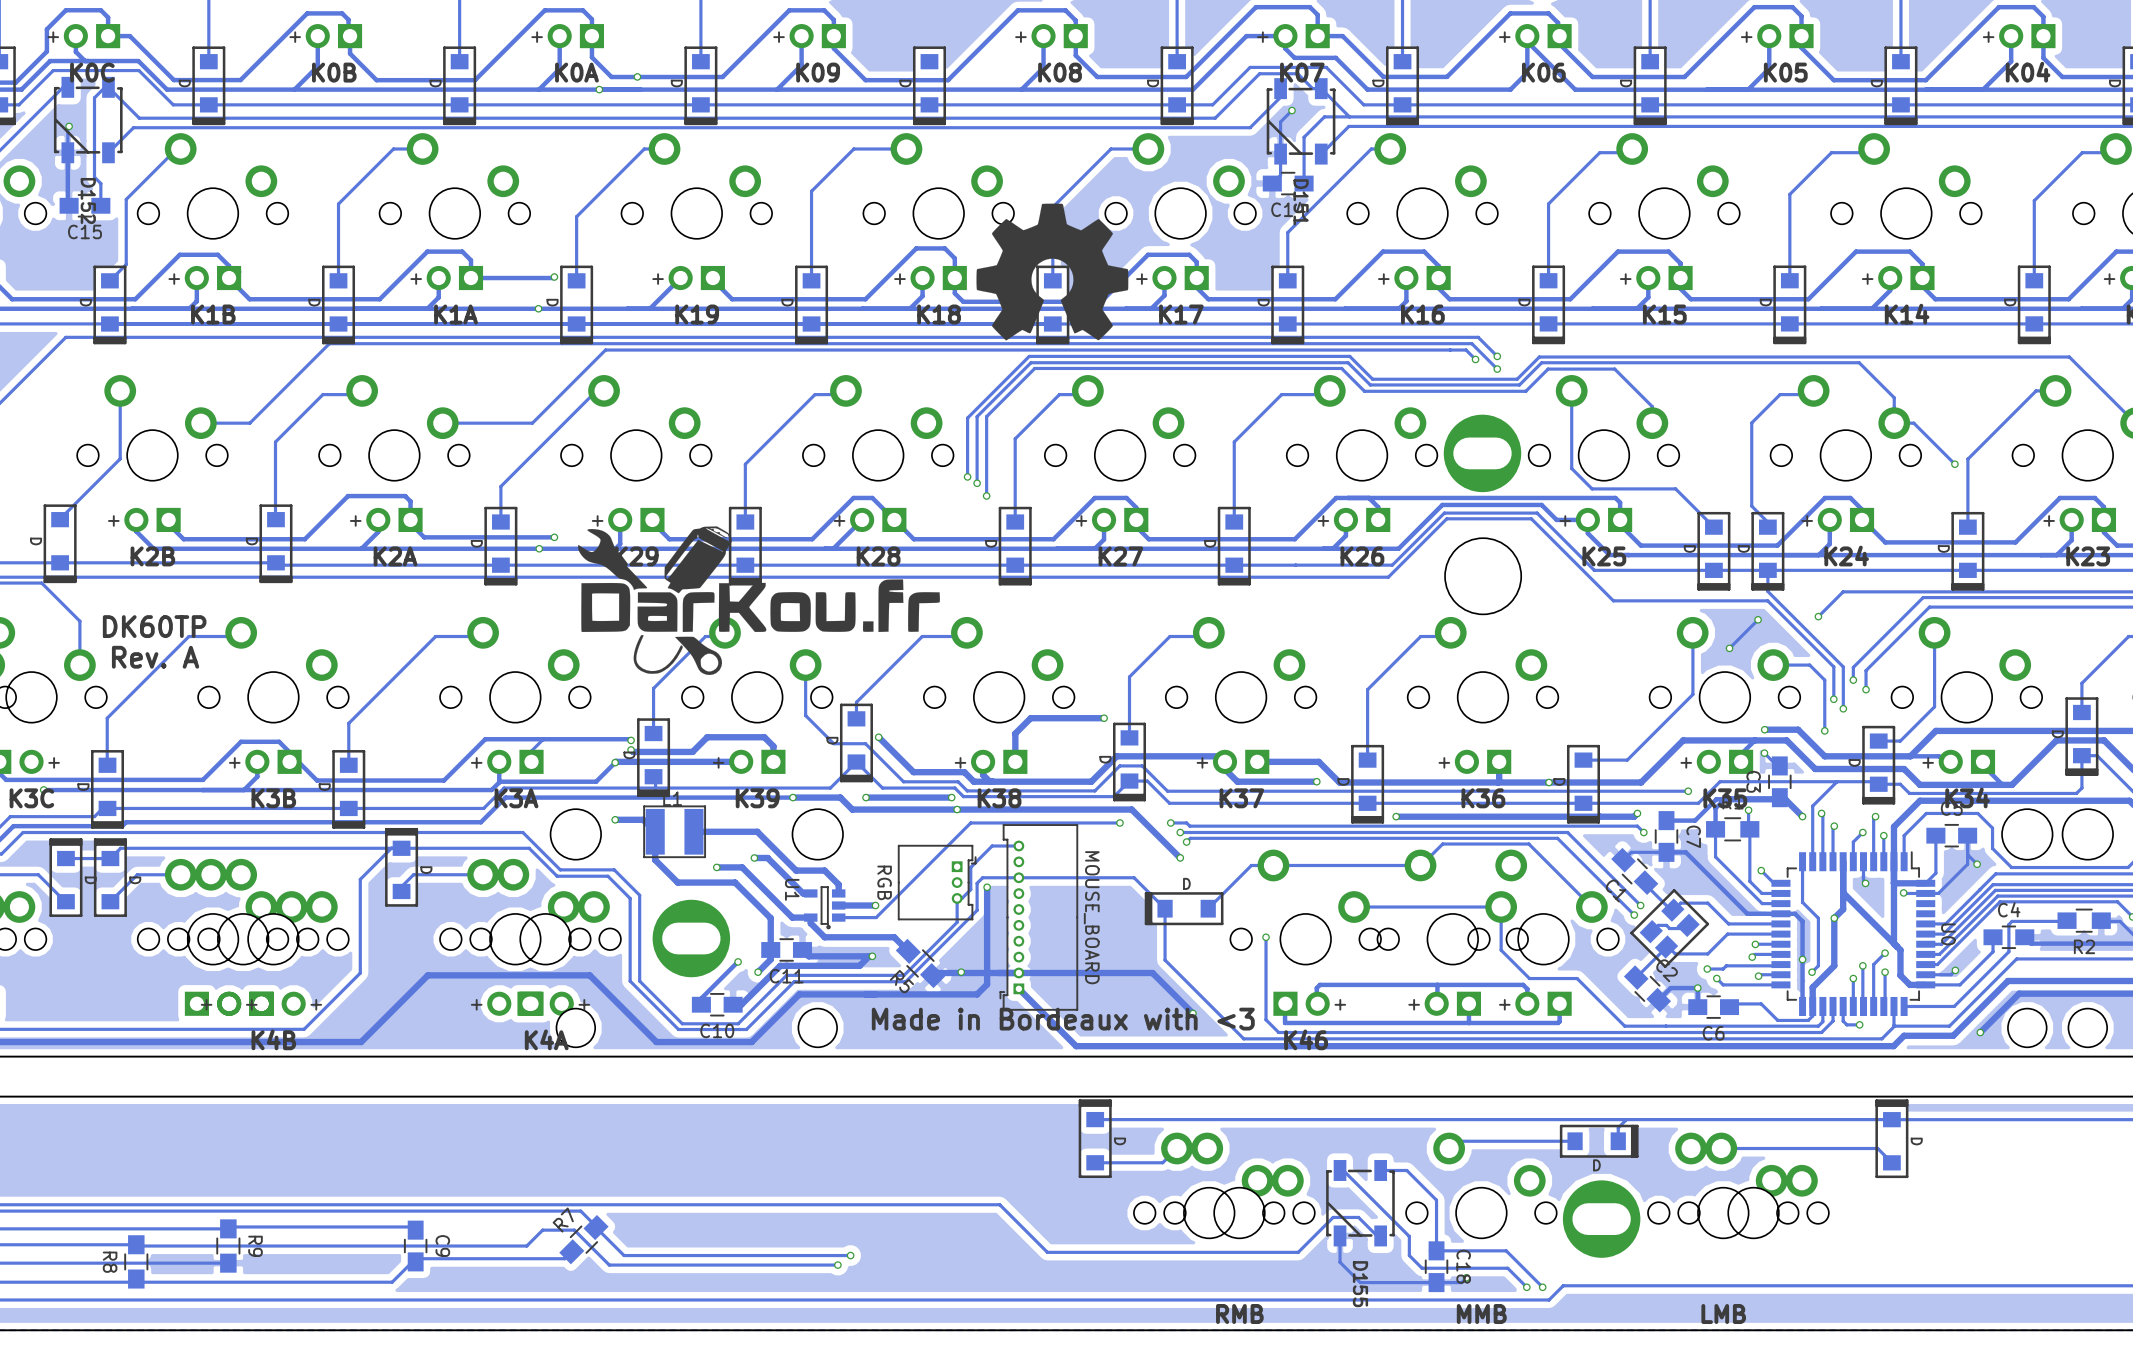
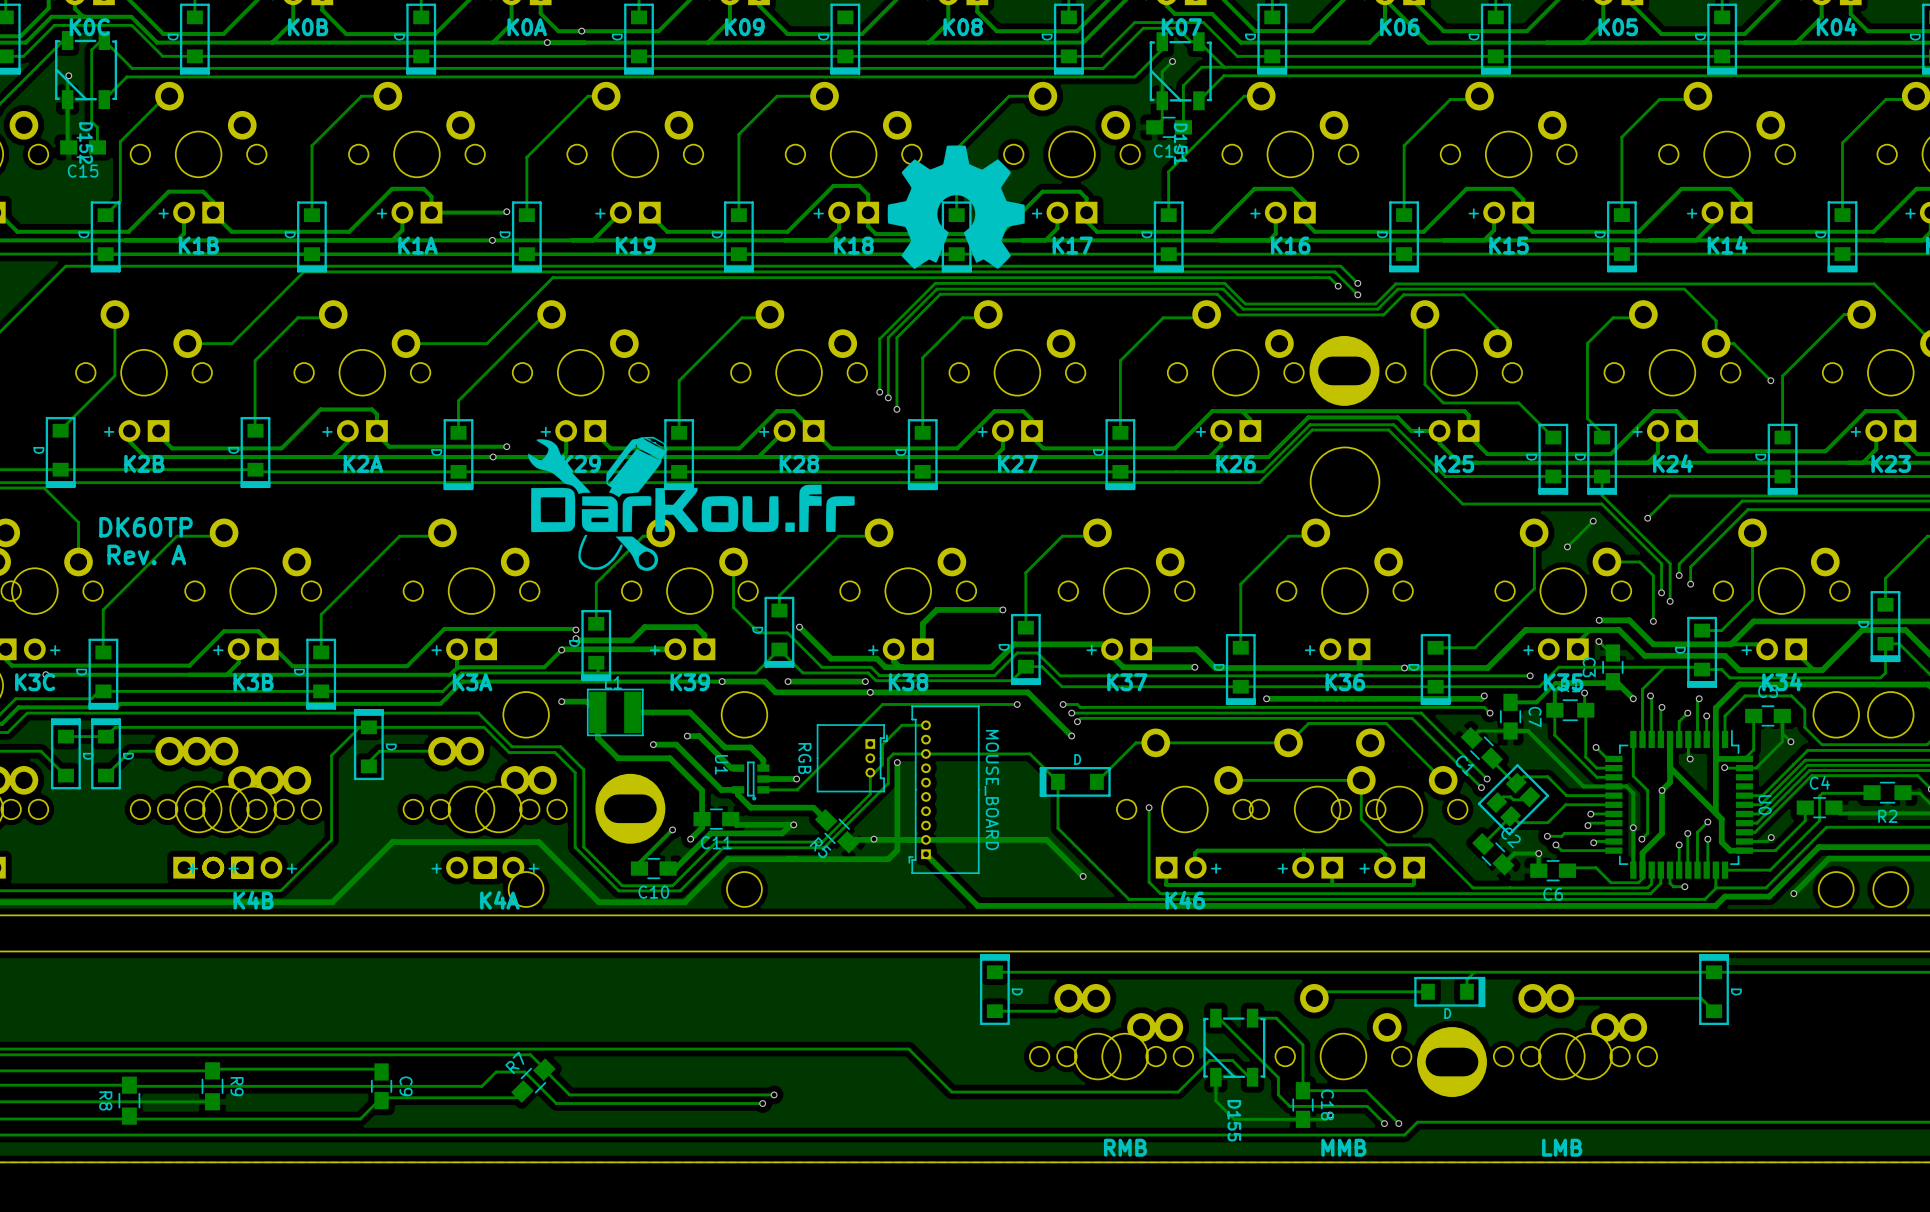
text: Made in Bordeaux with <3 (1063, 1019) -> none

